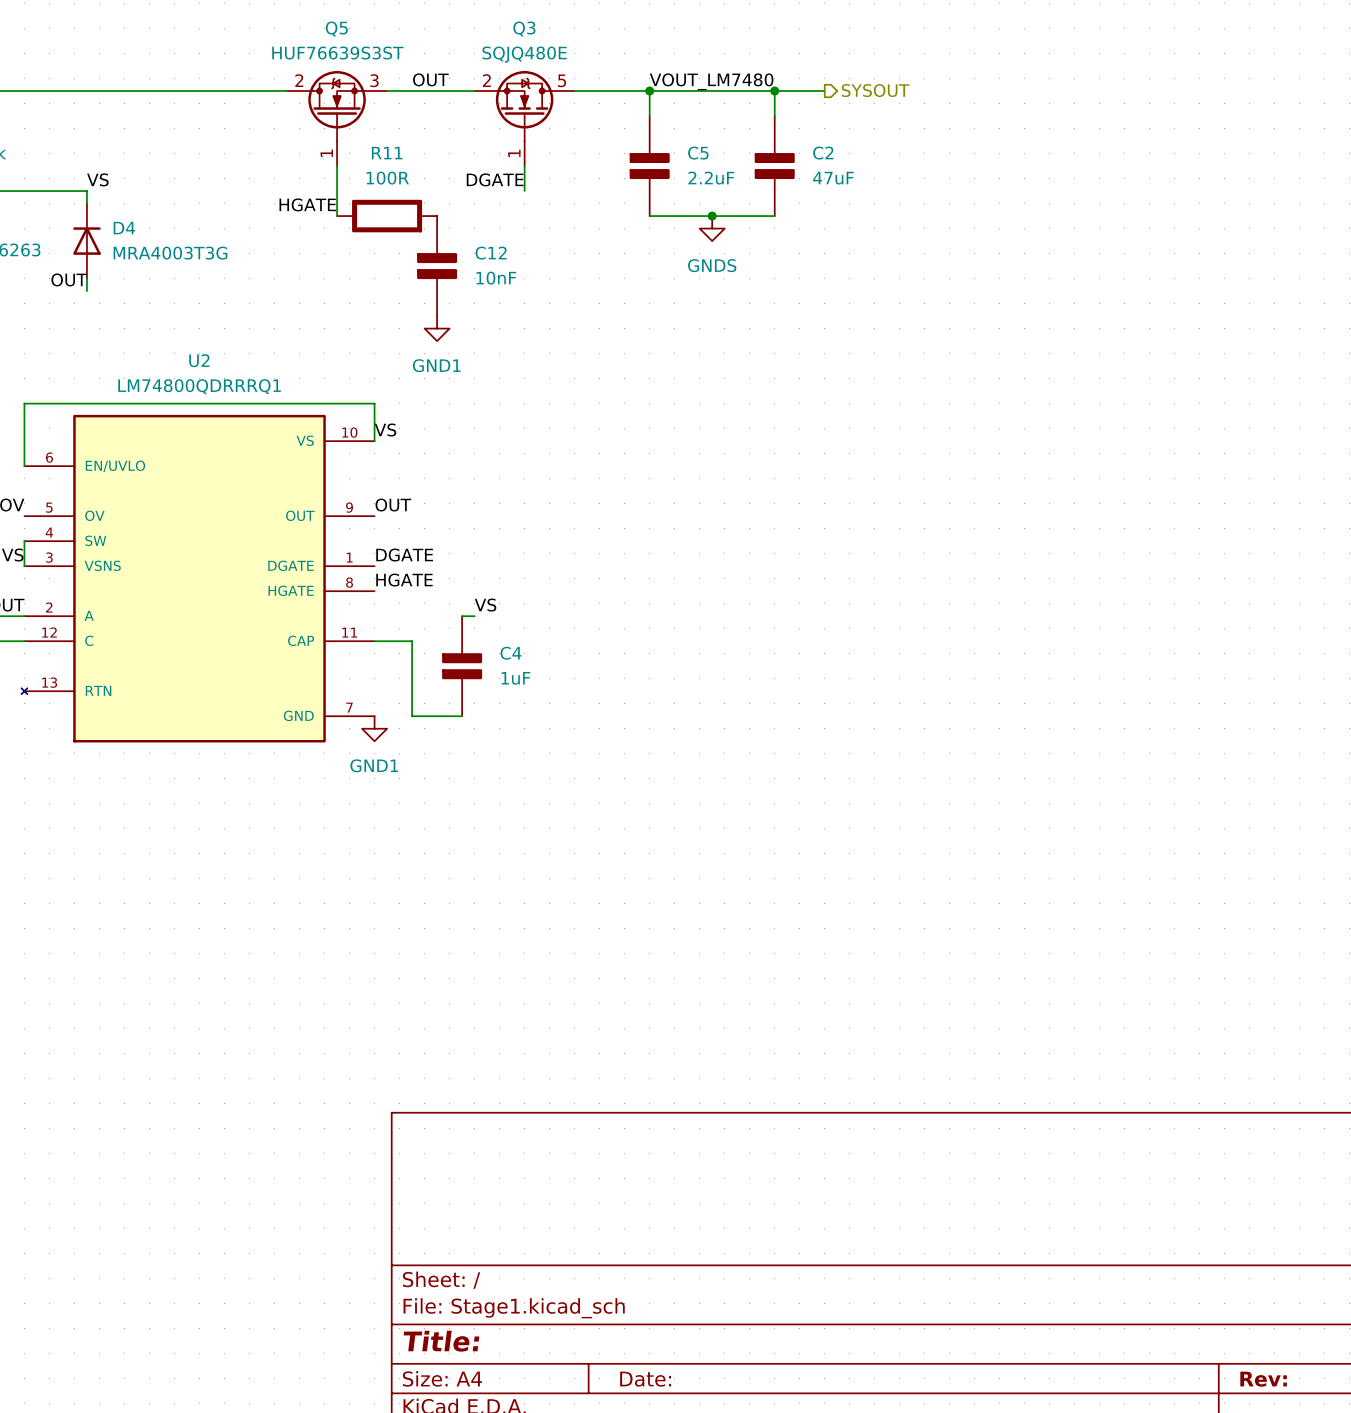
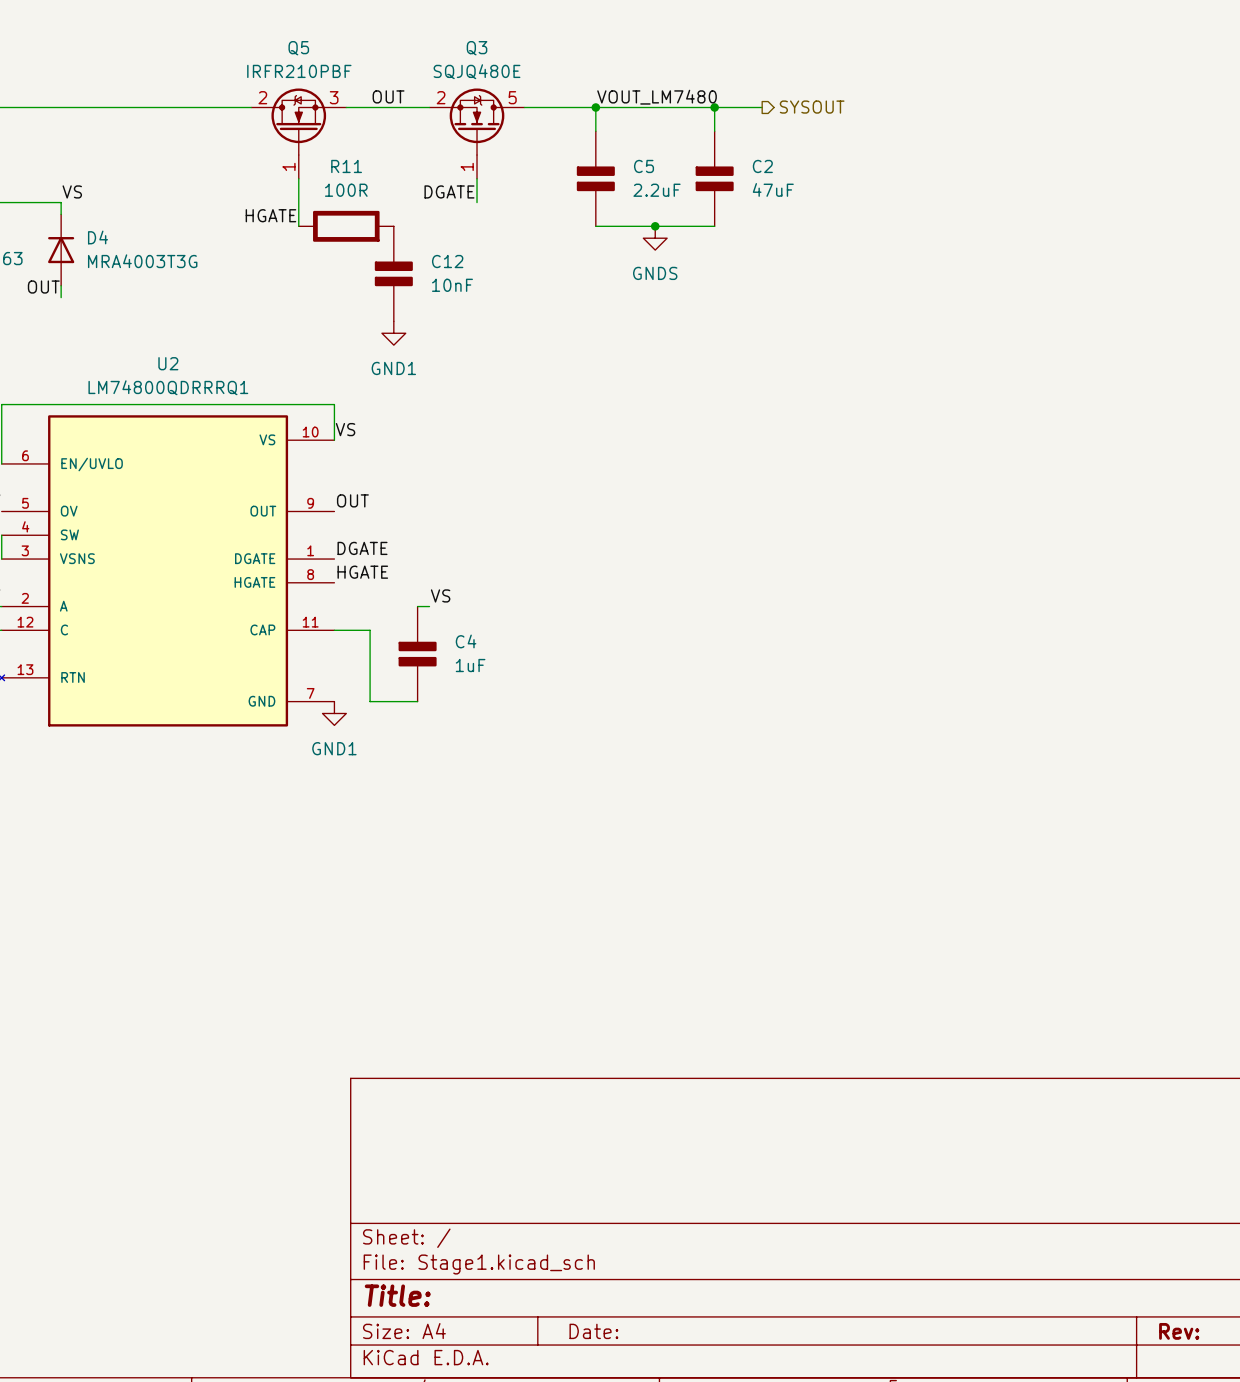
Q5 value: HUF76639S3ST (337, 53) -> IRFR210PBF (299, 71)

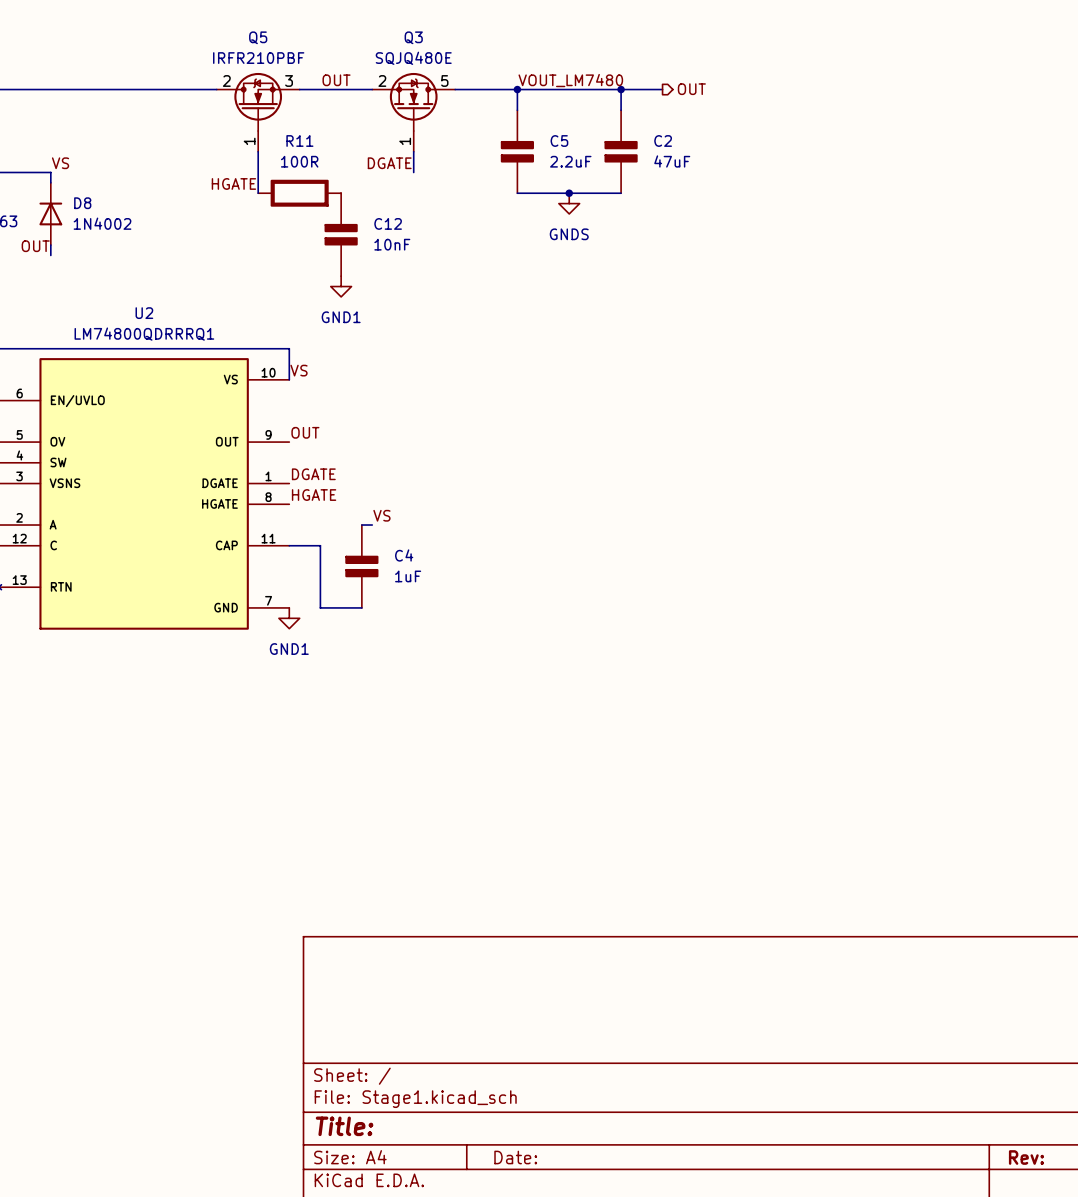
hierarchical label: SYSOUT (812, 107) -> OUT (691, 89)
D4 name: D4 (98, 237) -> D8 (82, 203)
D4 value: MRA4003T3G (142, 261) -> 1N4002 (102, 223)

